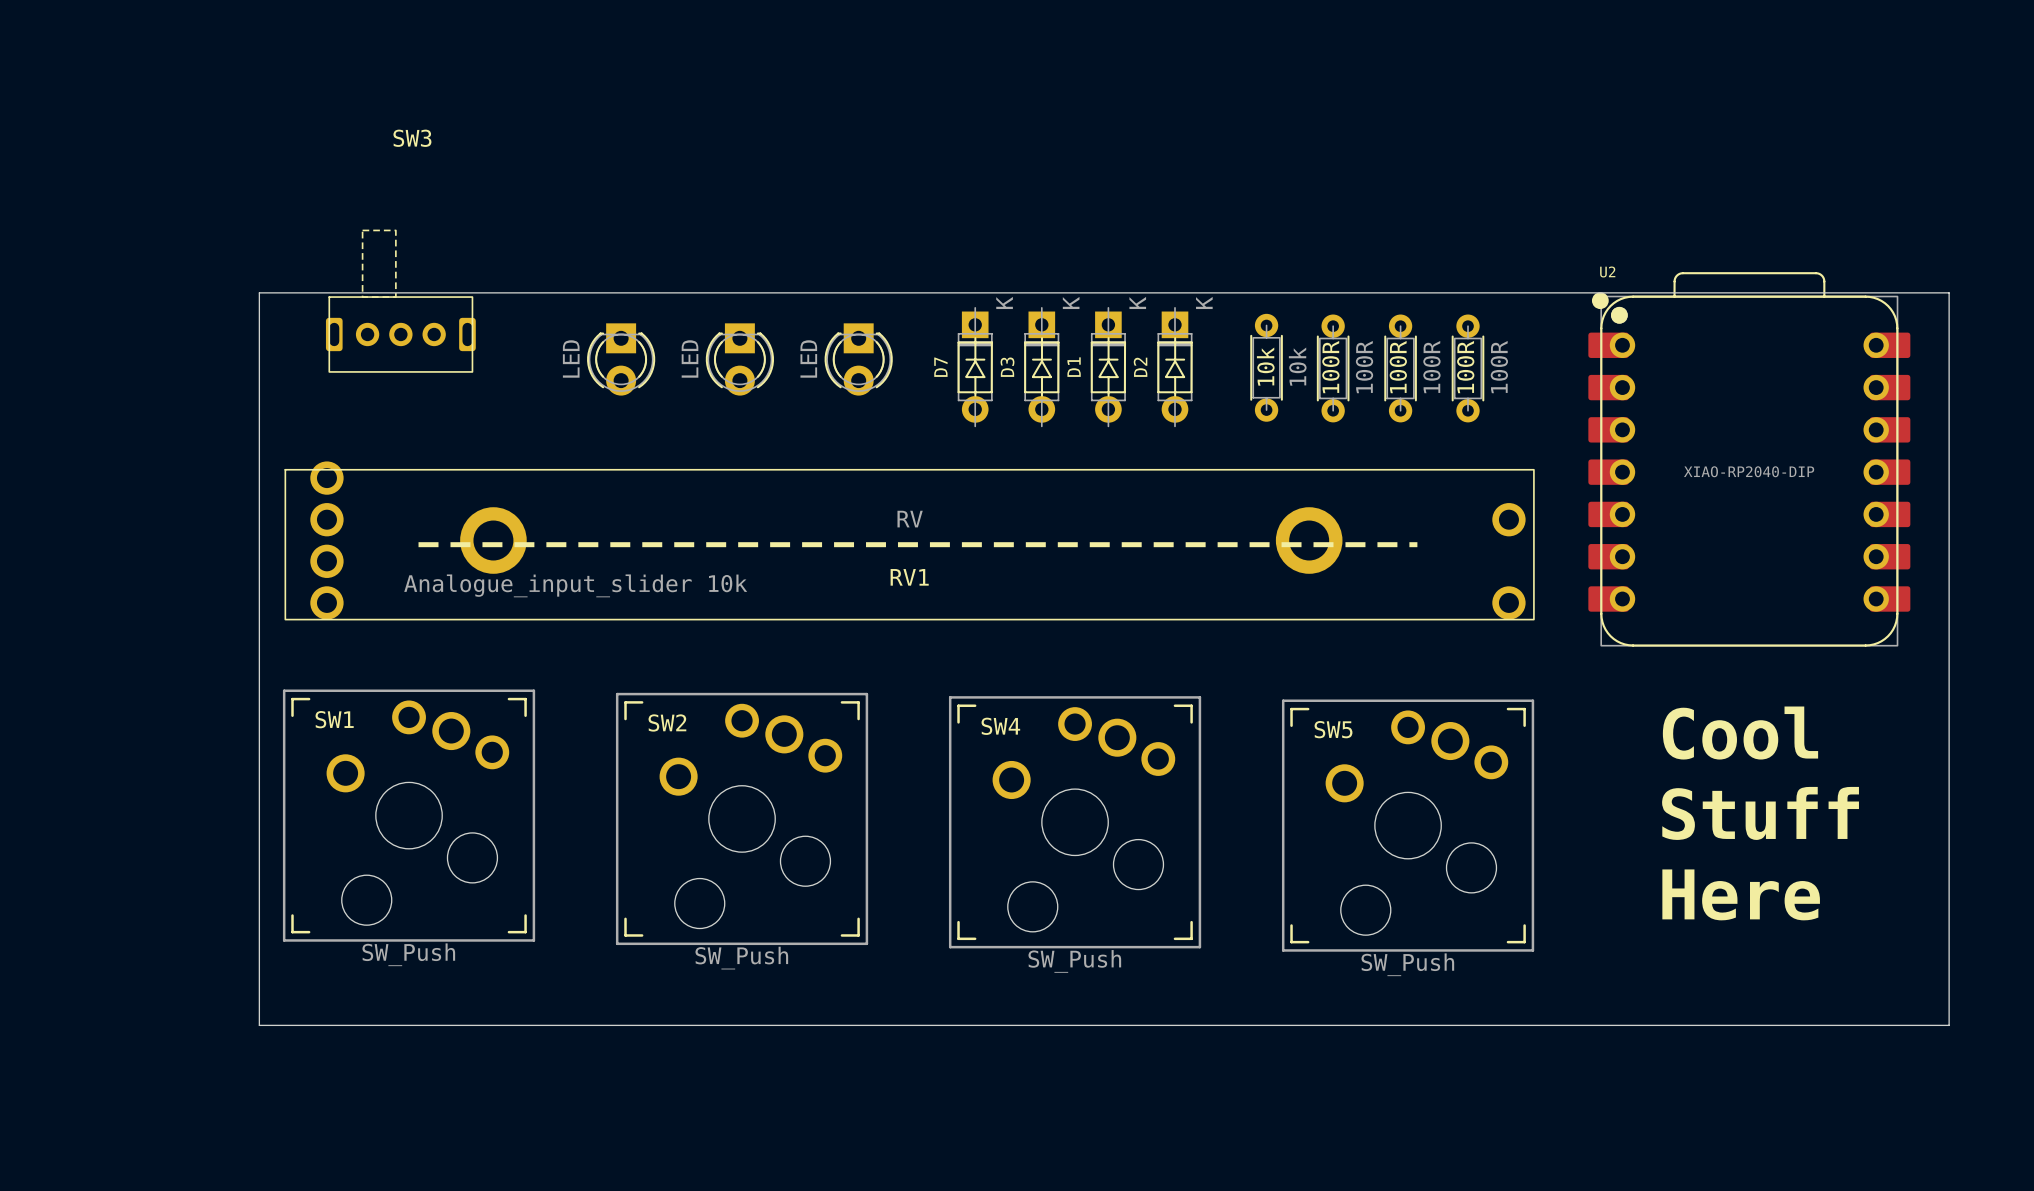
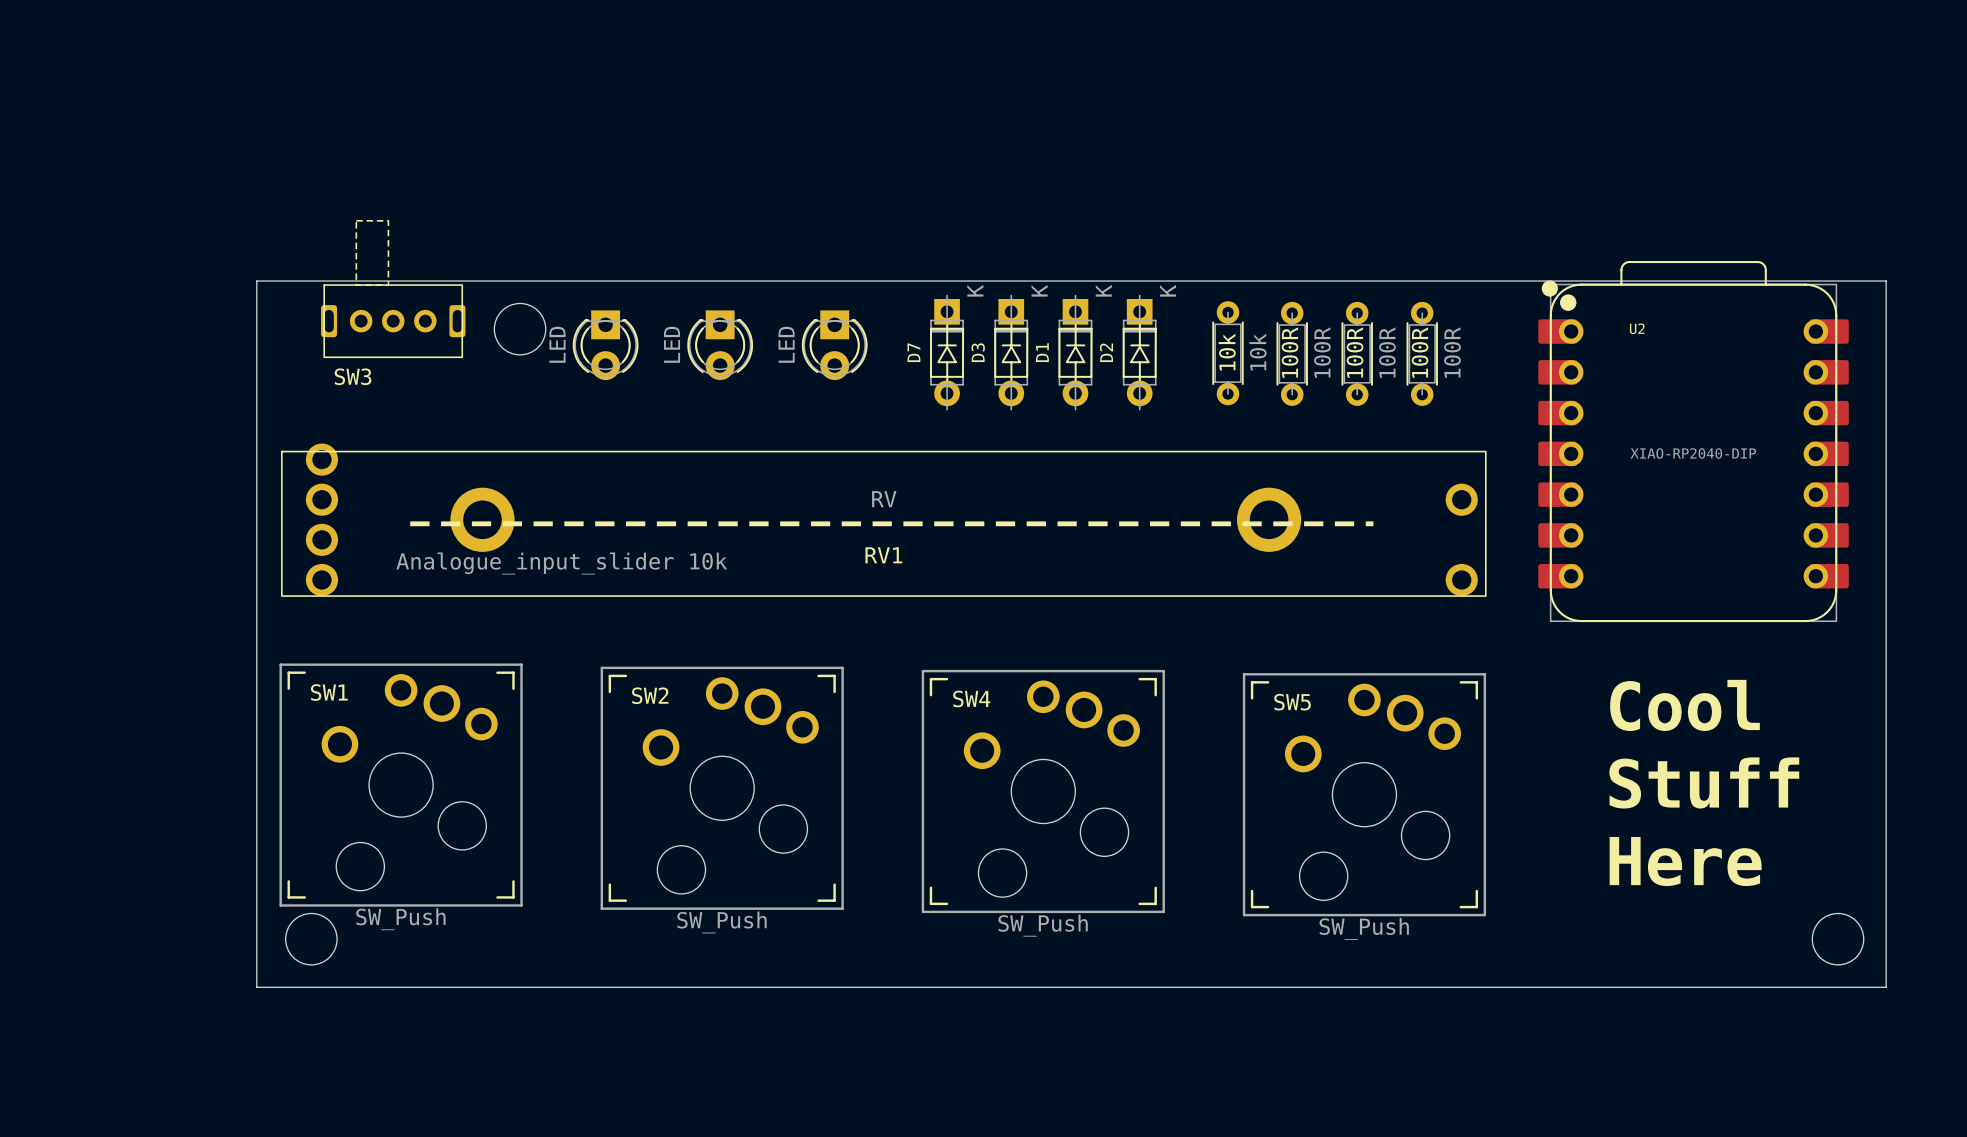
SW3 name position: SW3 (412, 138) -> SW3 (353, 376)
U2 name position: U2 (1607, 271) -> U2 (1637, 328)
round board edge: none -> [494, 303, 547, 356]
round board edge: none -> [285, 913, 338, 966]
round board edge: none -> [1812, 913, 1864, 966]

